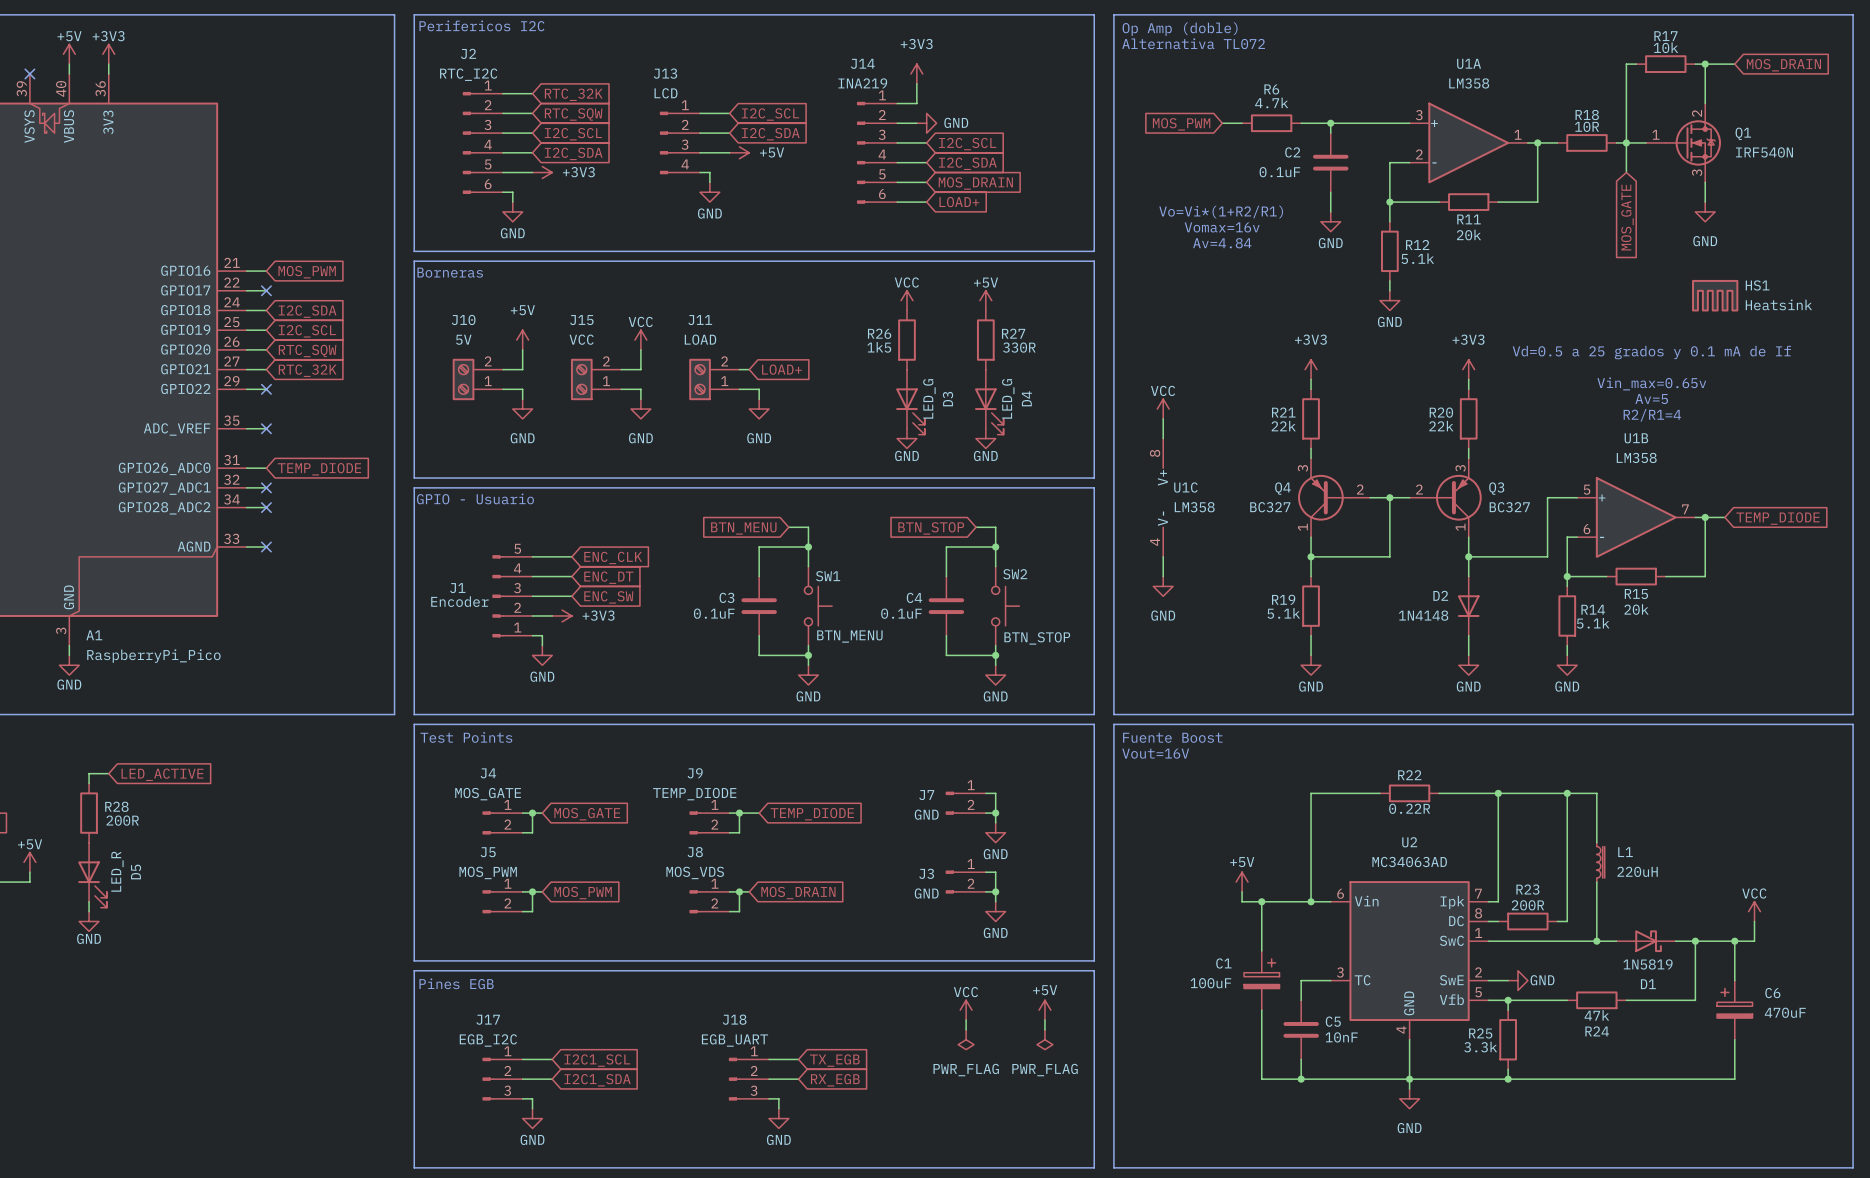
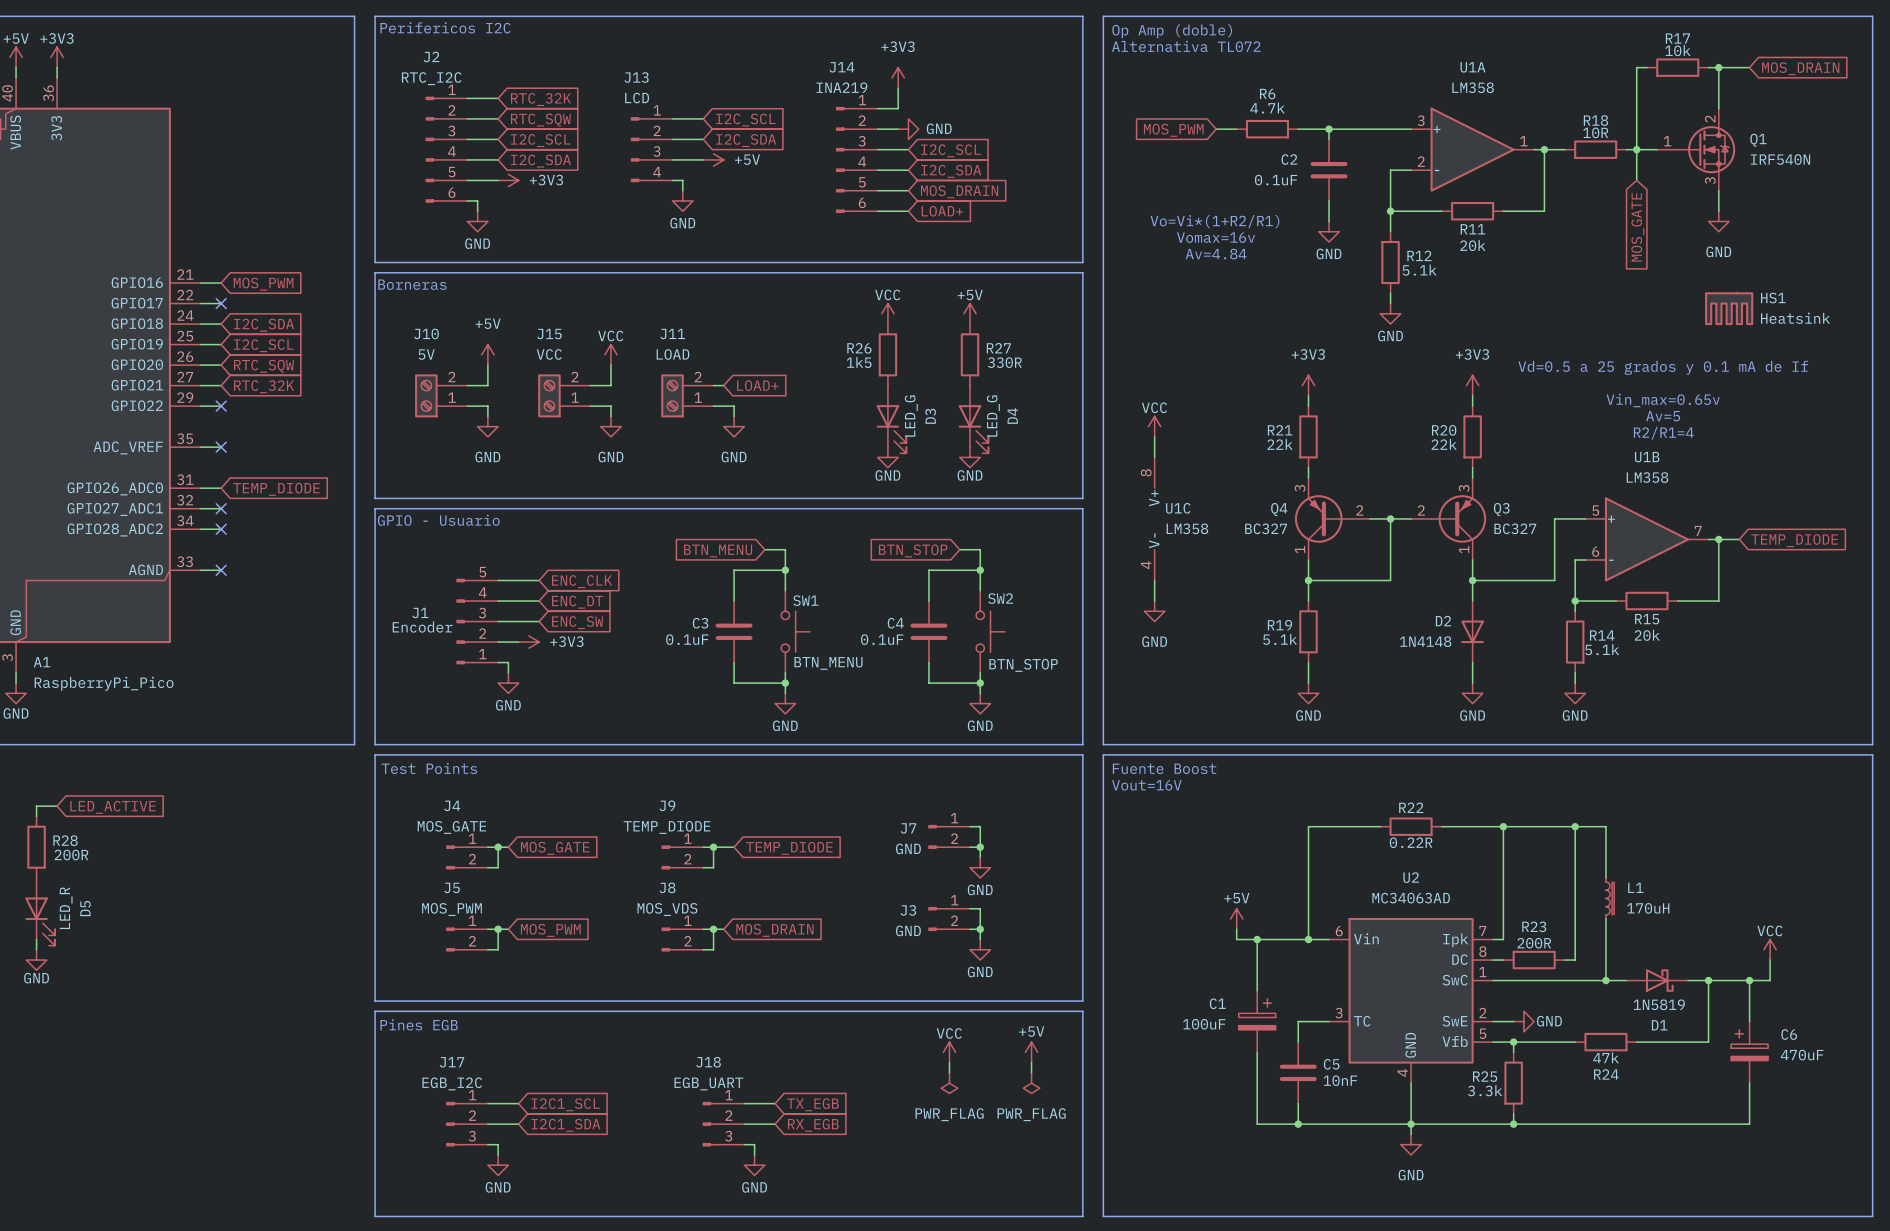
L1 value: 220uH (1637, 871) -> 170uH (1648, 908)

